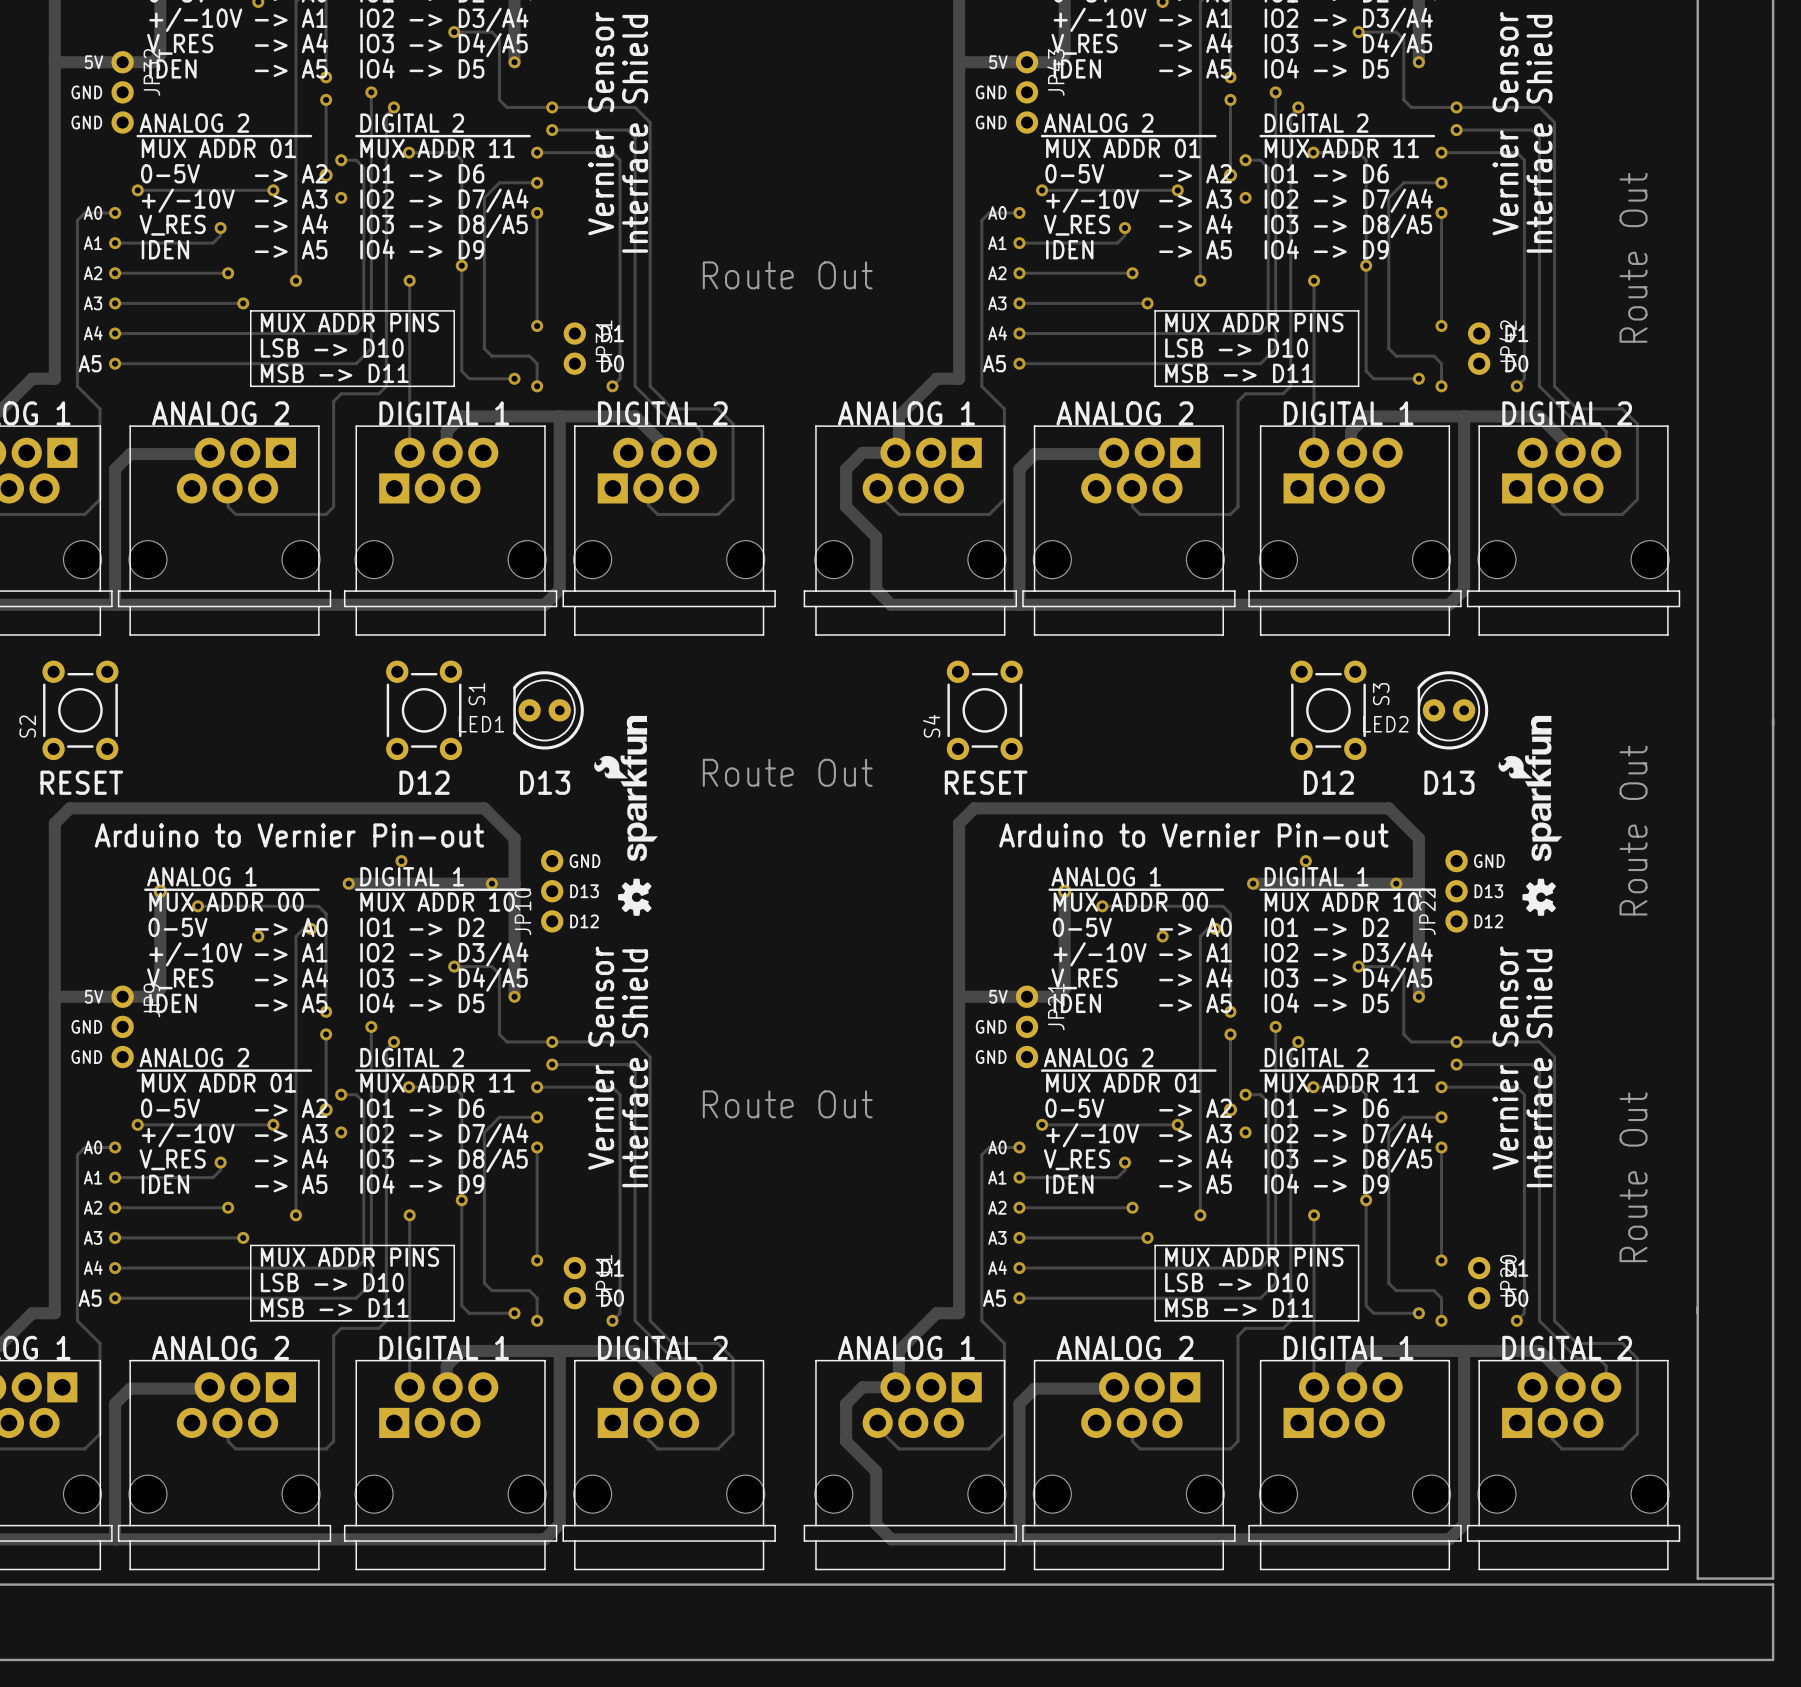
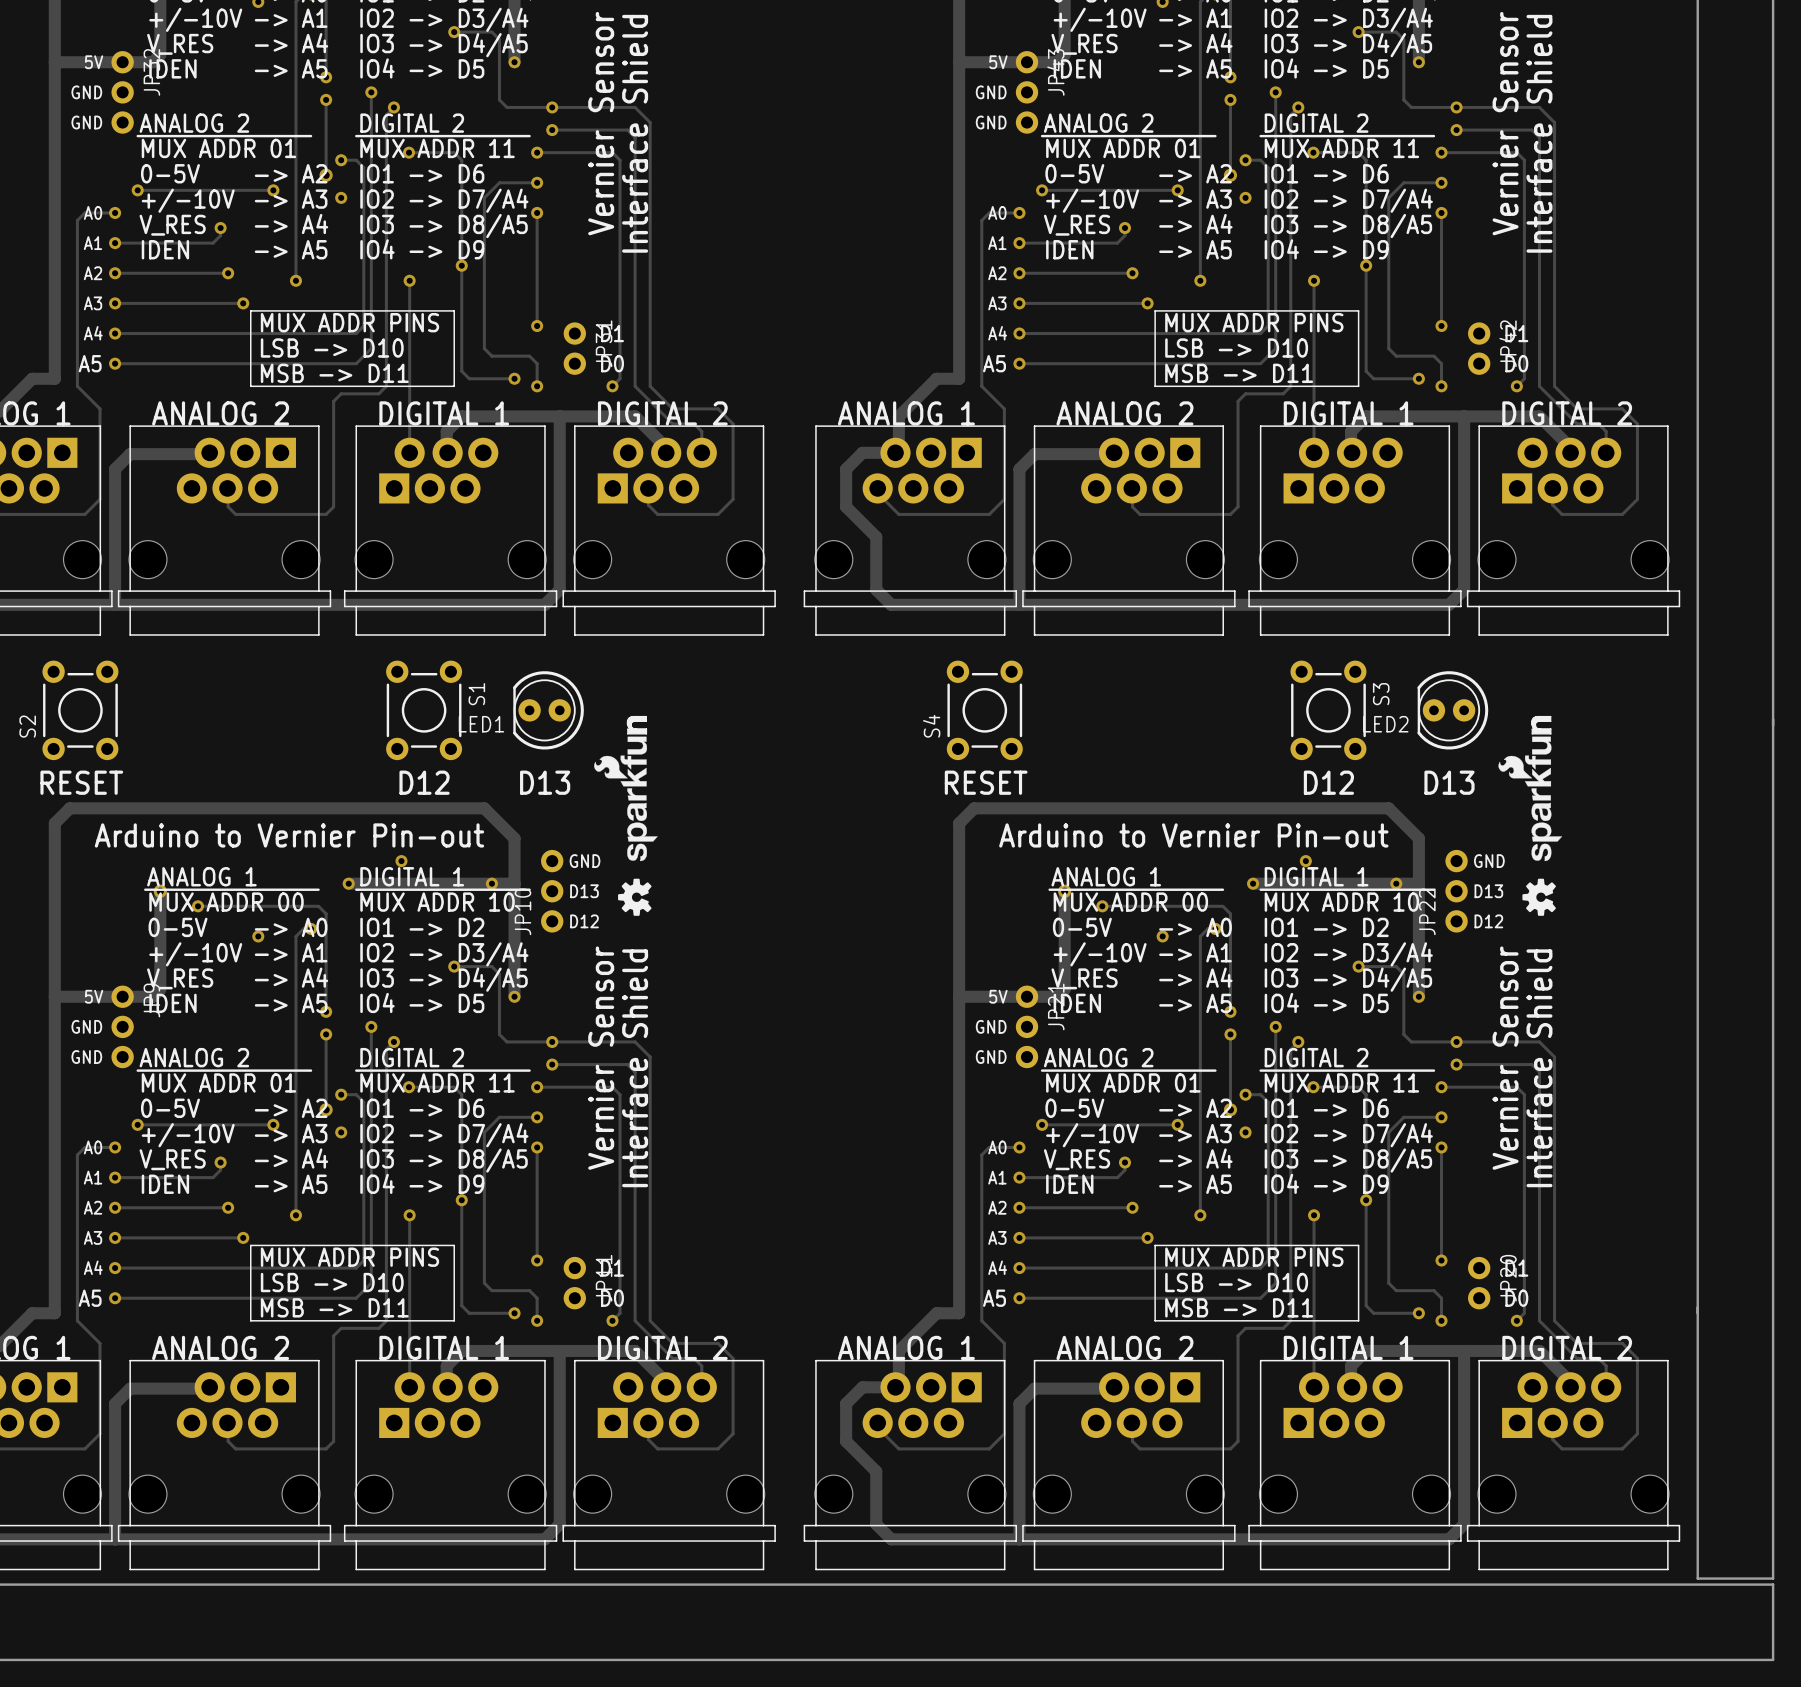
text: Route Out (1633, 257) -> none
text: Route Out (787, 275) -> none
text: Route Out (787, 772) -> none
text: Route Out (1633, 830) -> none
text: Route Out (787, 1104) -> none
text: Route Out (1633, 1177) -> none

